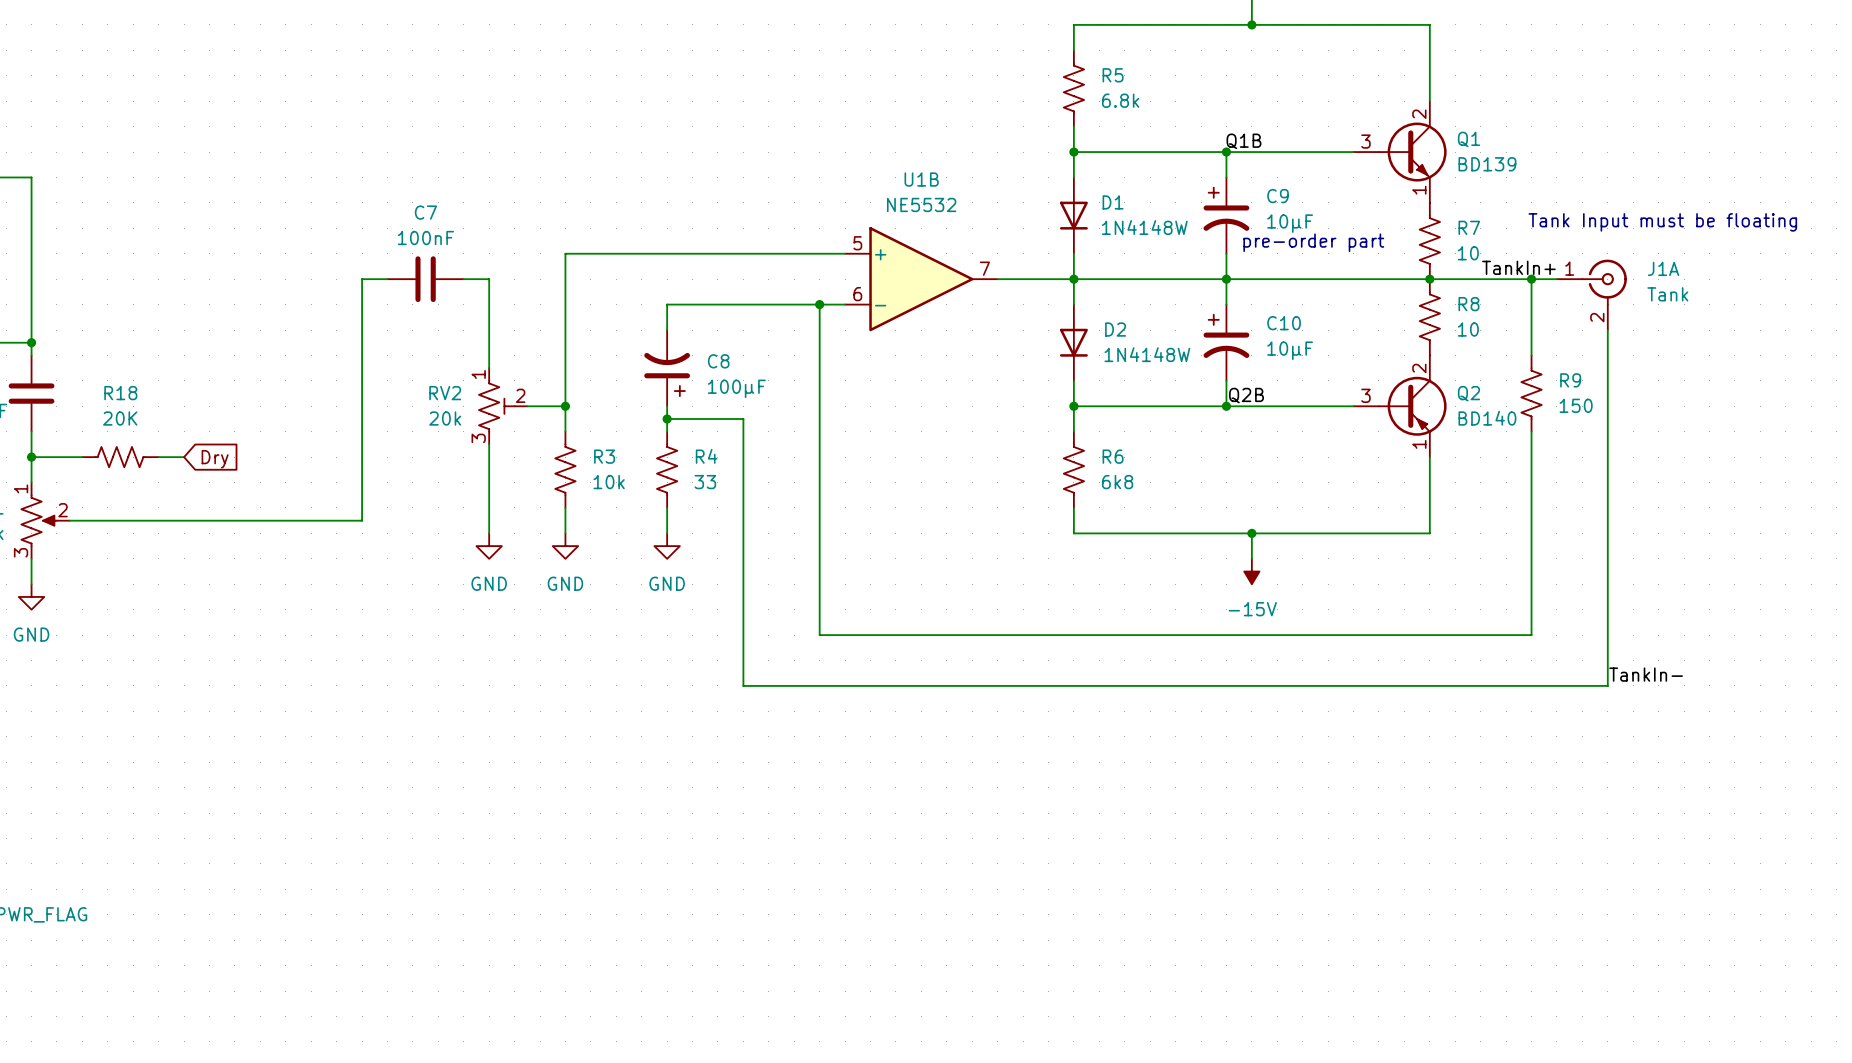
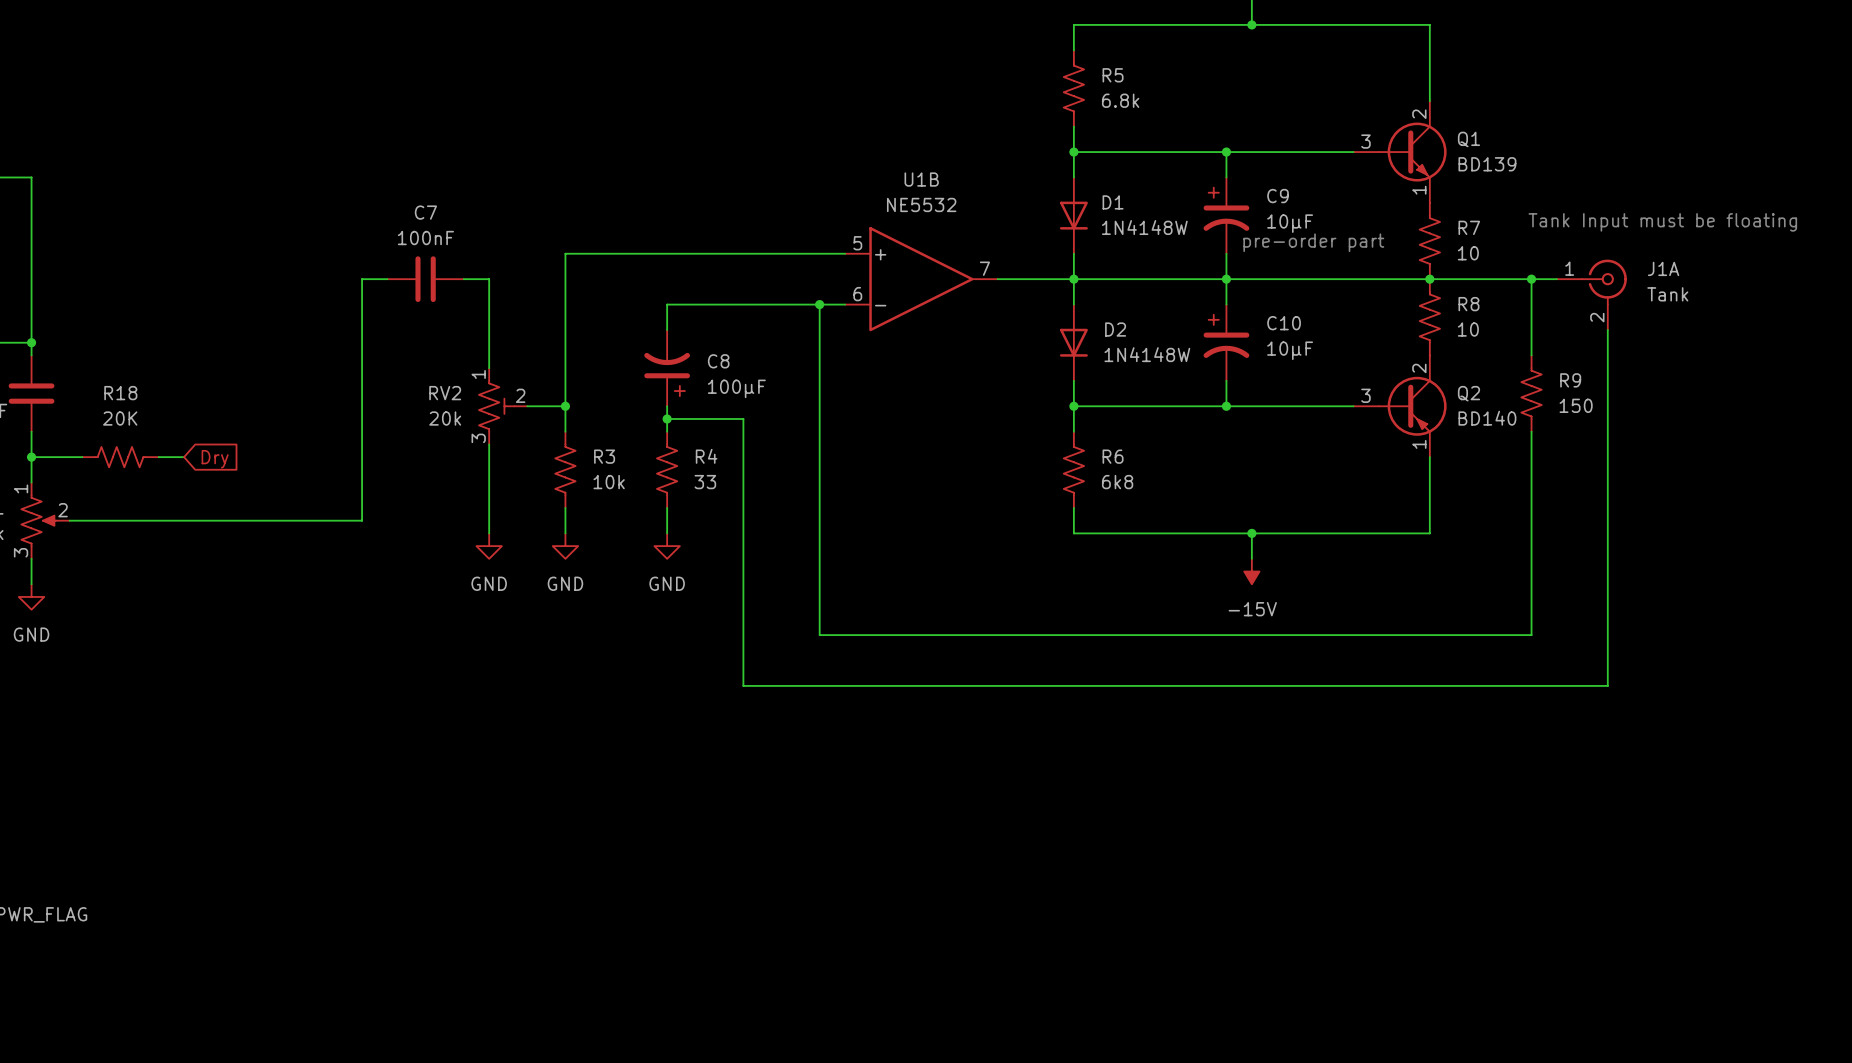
label: Q1B (1243, 141) -> none
label: TankIn+ (1518, 267) -> none
label: Q2B (1246, 395) -> none
label: TankIn- (1646, 674) -> none

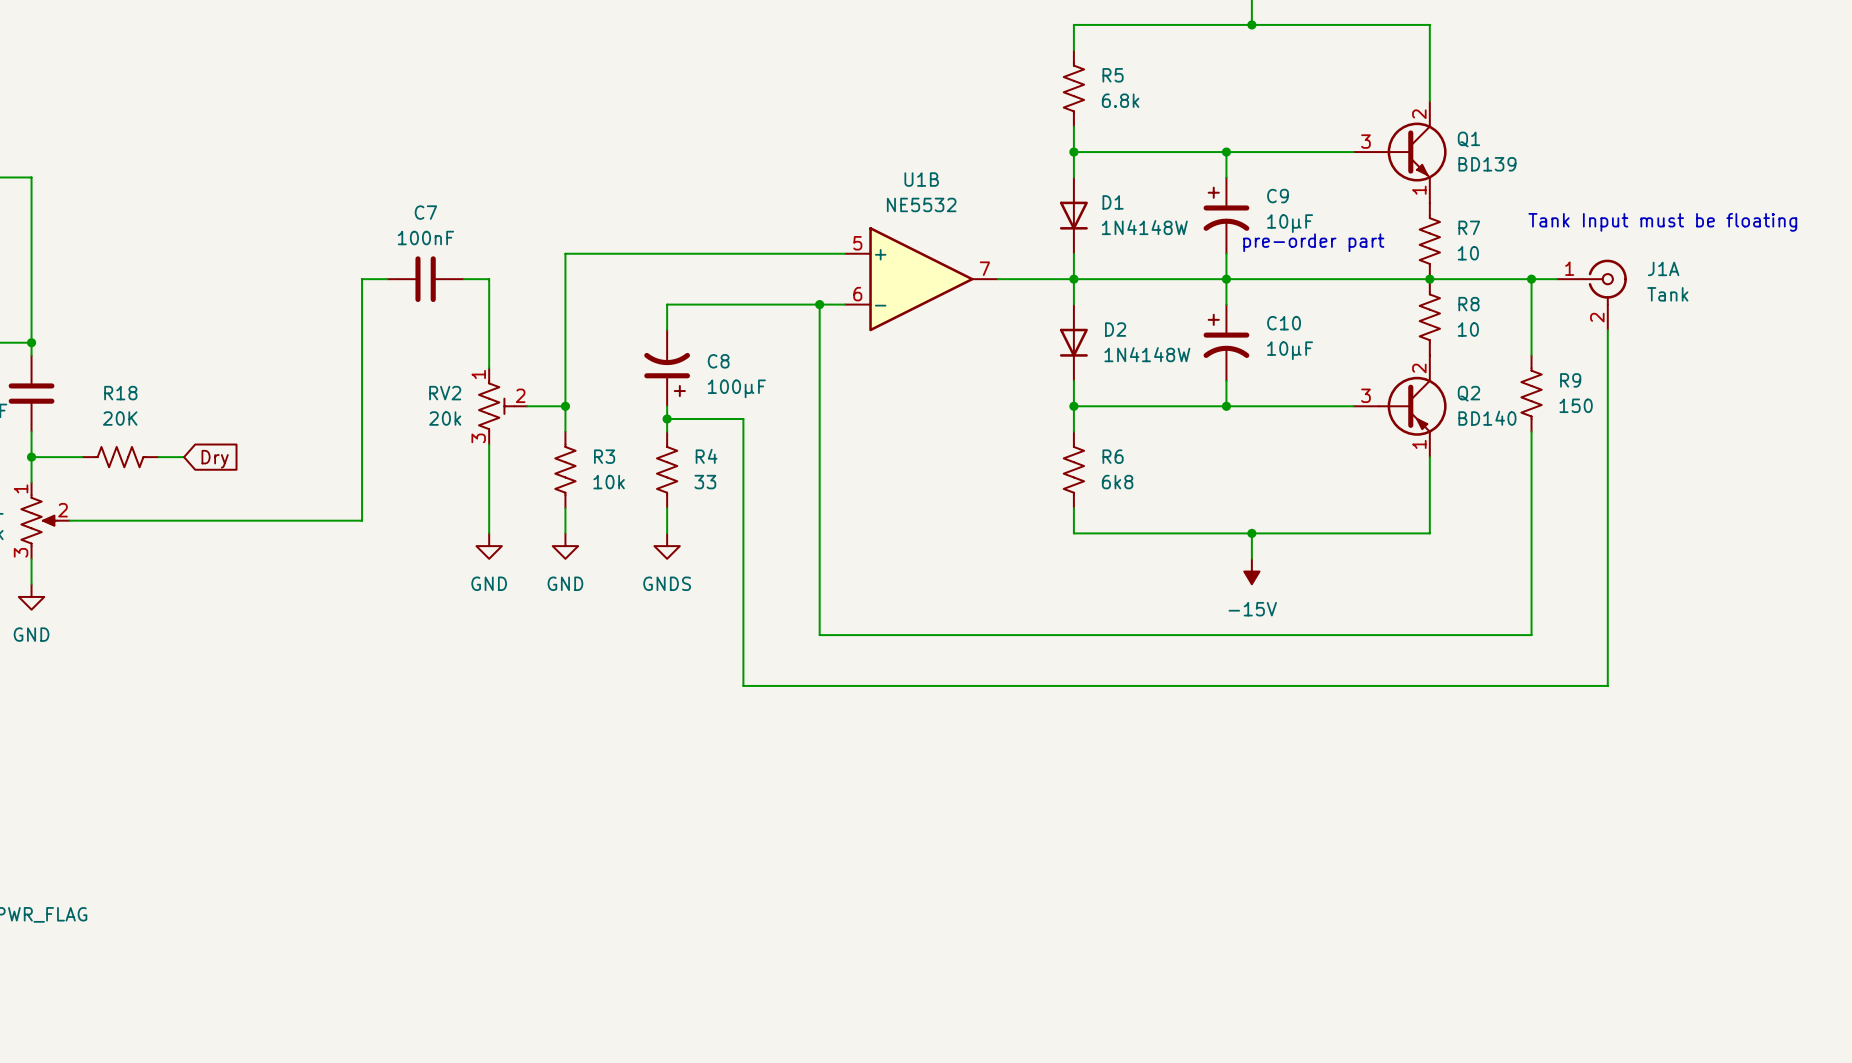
power symbol: GND (667, 546) -> GNDS (667, 546)

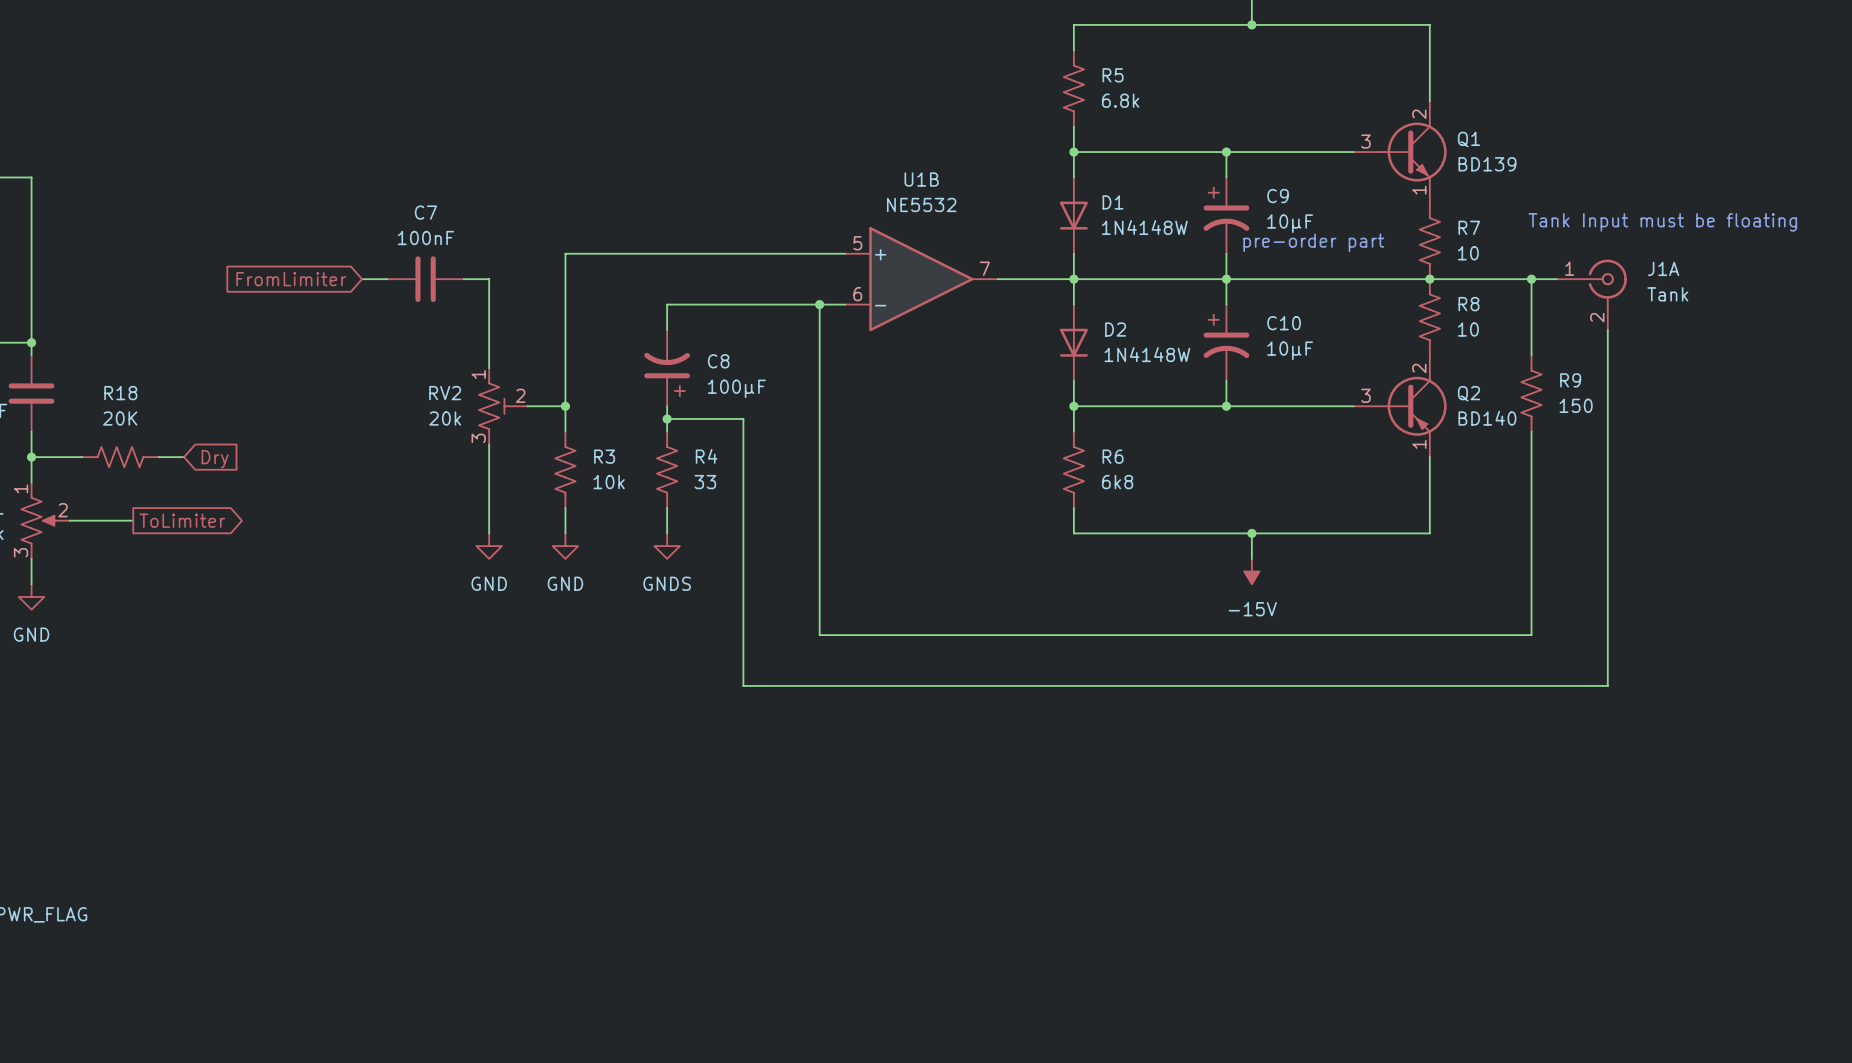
global label: none -> FromLimiter (291, 279)
wire: (362, 279) (362, 520) (133, 520) -> none
global label: none -> ToLimiter (182, 520)

